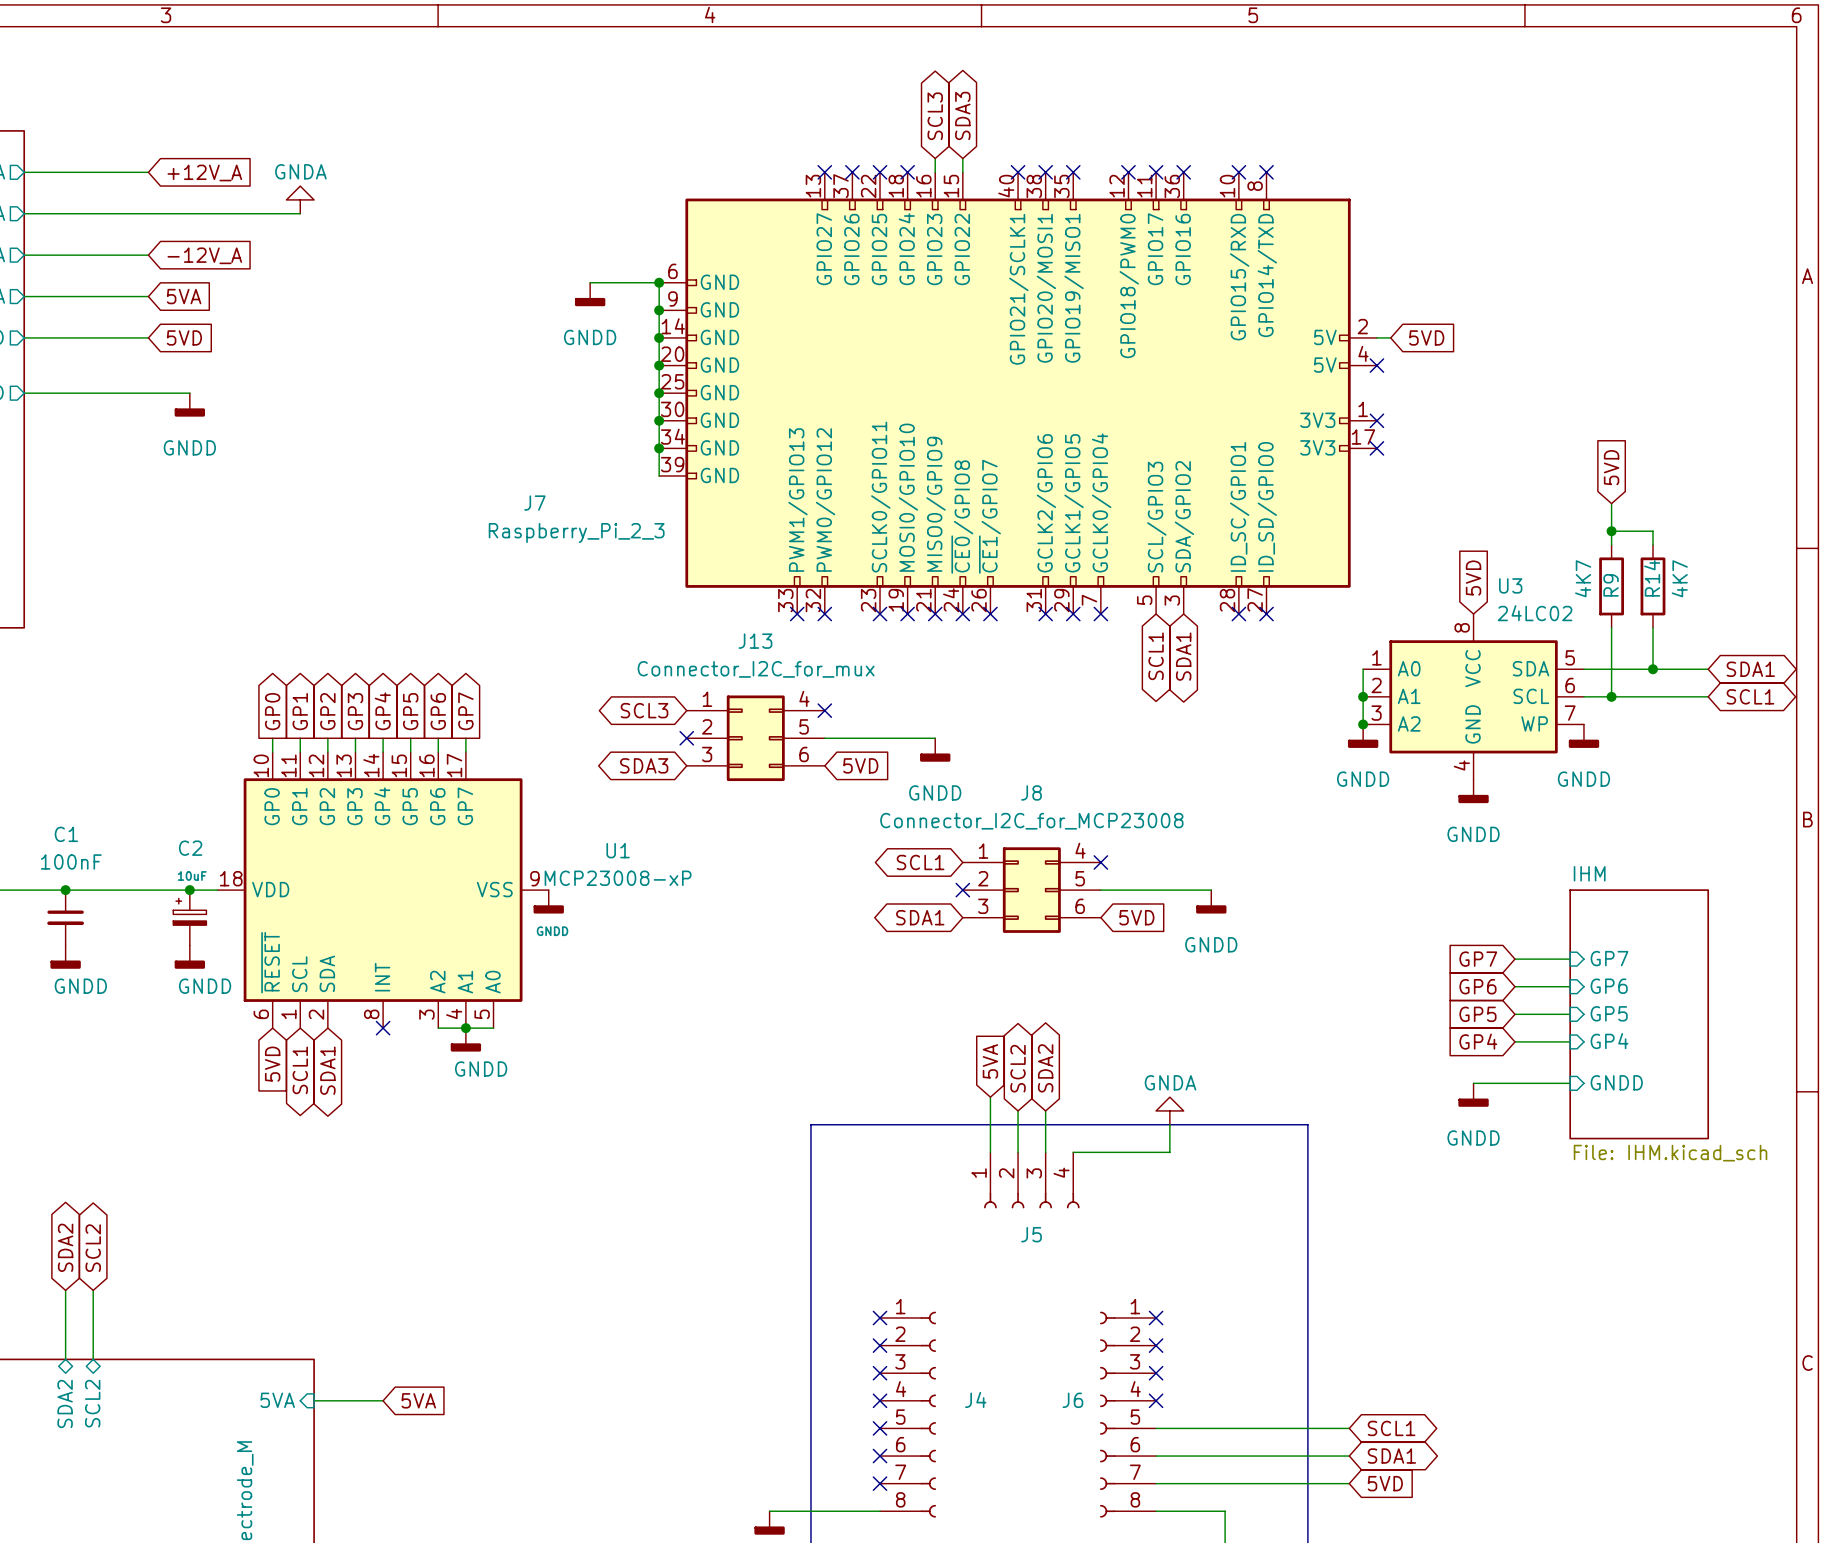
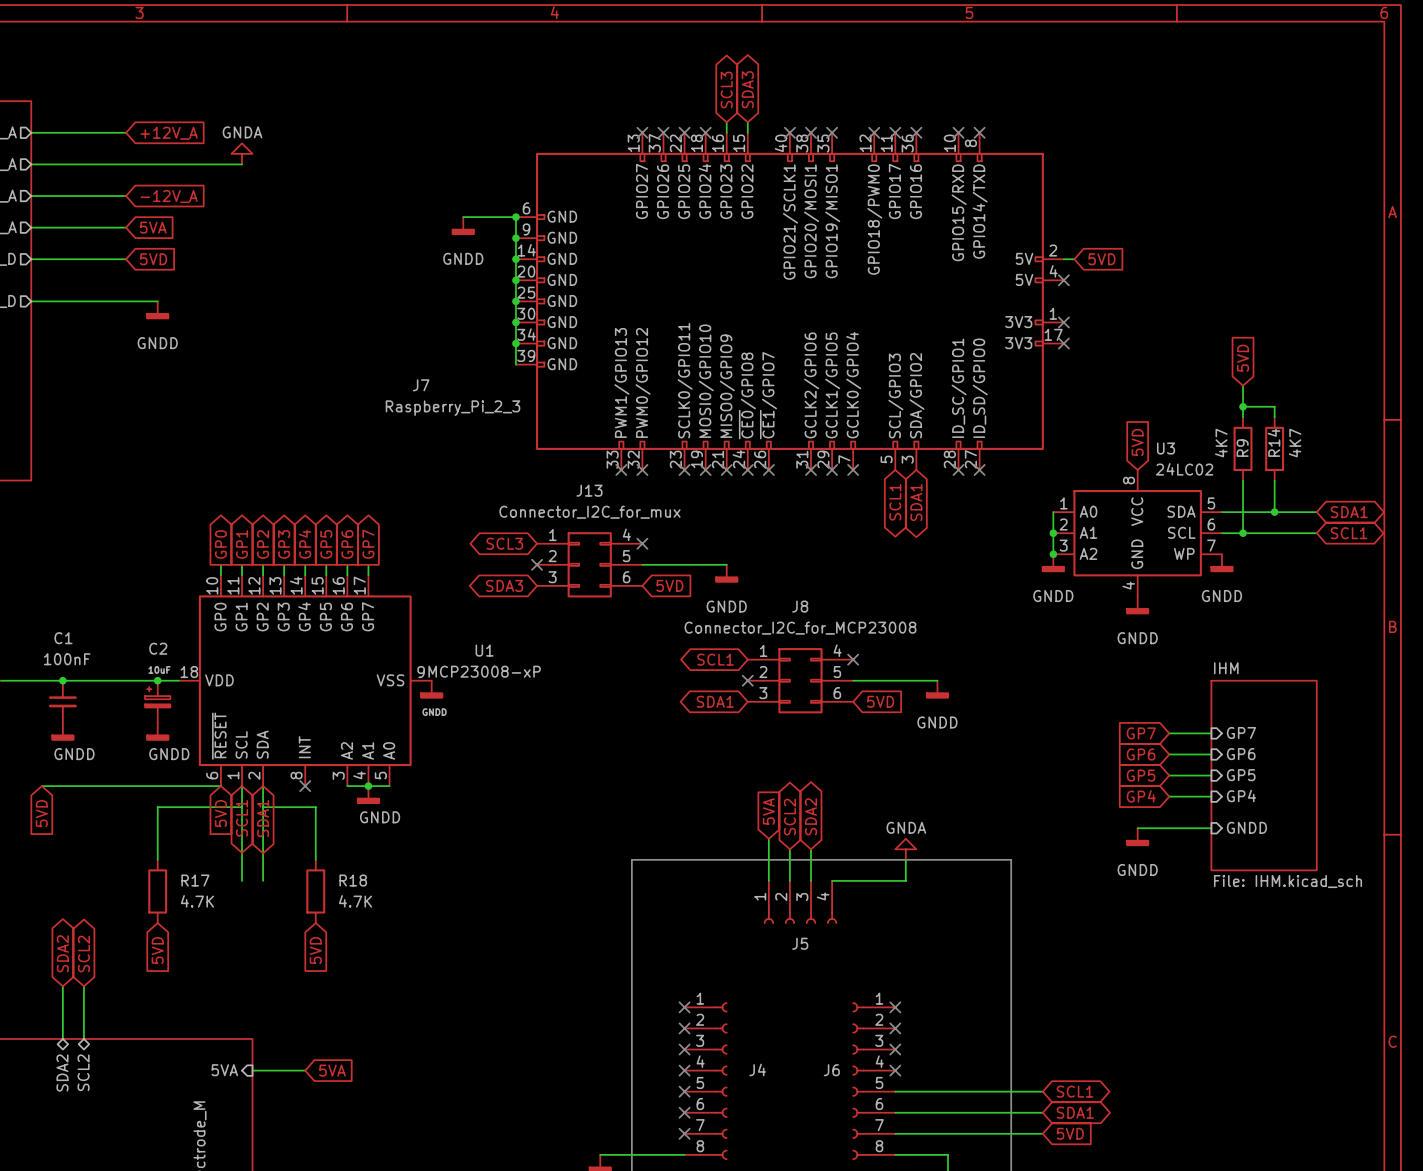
wire: none -> (41, 786) (220, 786)
wire: none -> (242, 786) (242, 880)
wire: none -> (263, 786) (263, 880)
wire: none -> (242, 807) (157, 807) (157, 859)
wire: none -> (263, 807) (315, 807) (315, 859)
global label: none -> 5VD (41, 813)
R17: none -> 4.7K (157, 891)
R18: none -> 4.7K (315, 891)
global label: none -> 5VD (157, 950)
global label: none -> 5VD (315, 950)

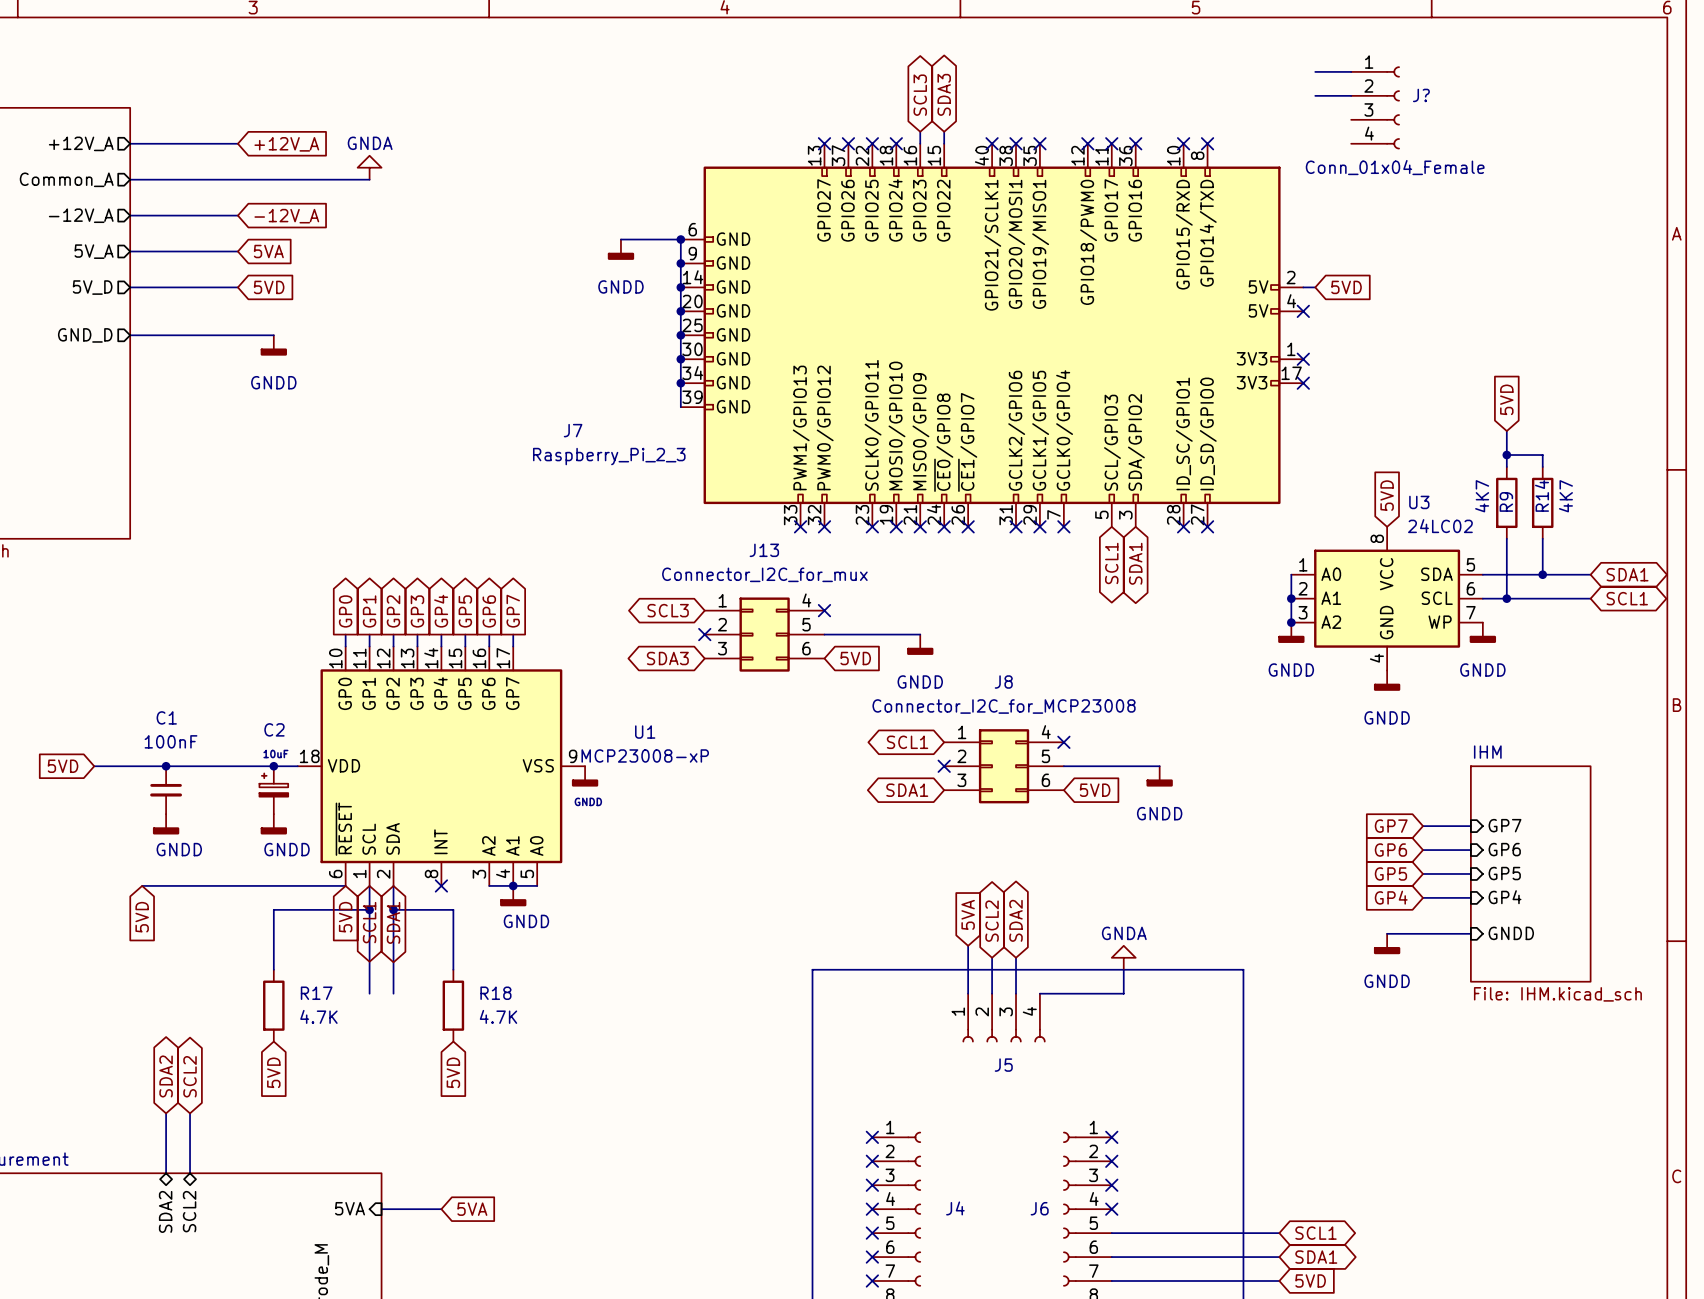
wire: none -> (1315, 71) (1351, 71)
wire: none -> (1315, 95) (1351, 95)
J?: none -> Conn_01x04_Female (1375, 107)
junction: none -> (369, 909)
junction: none -> (393, 909)

